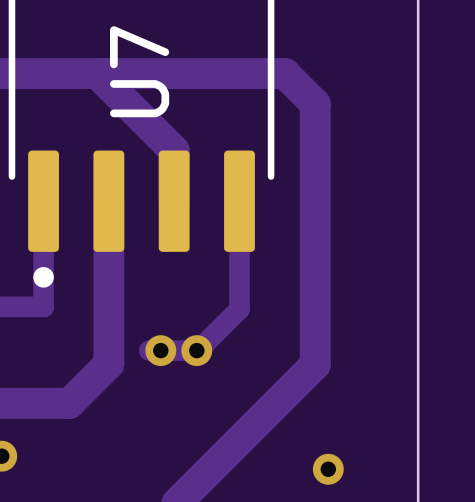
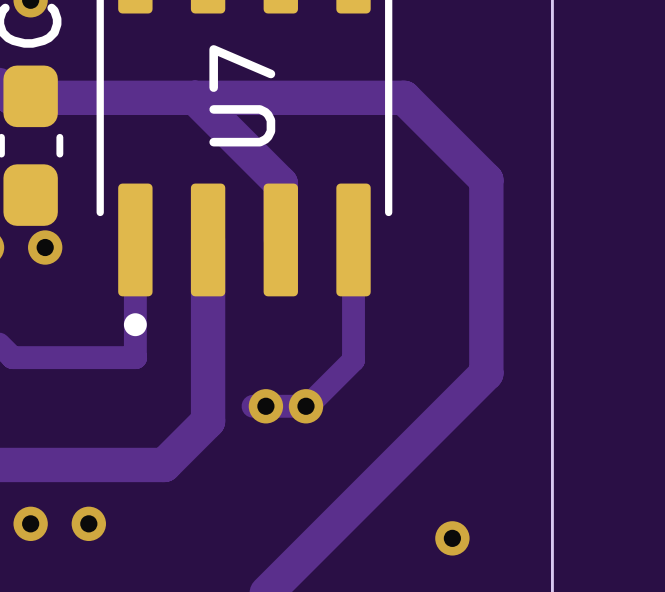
track: (315, 103) (315, 364) -> (437, 131) (486, 180) (486, 373) (437, 421)

